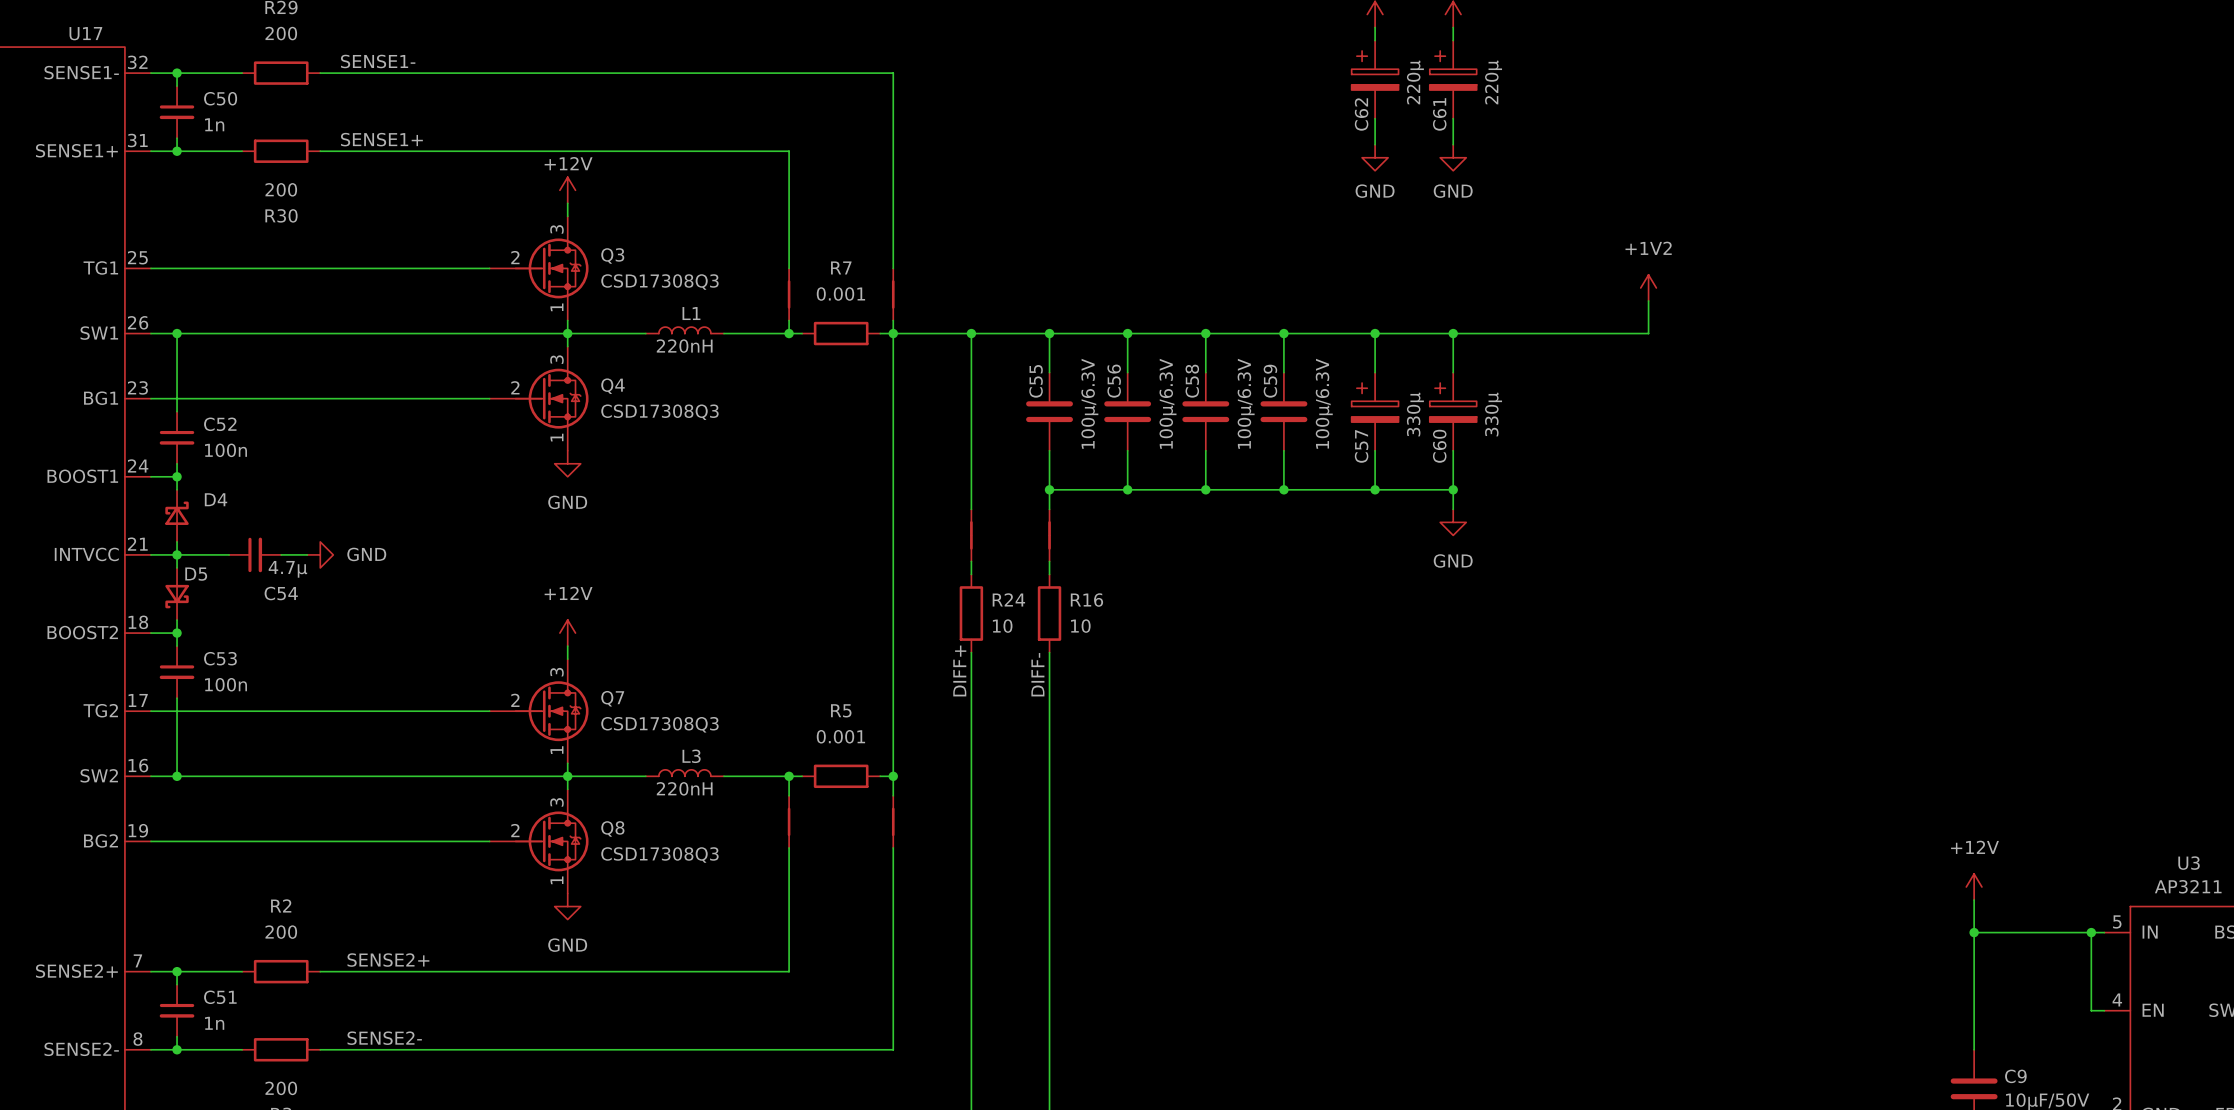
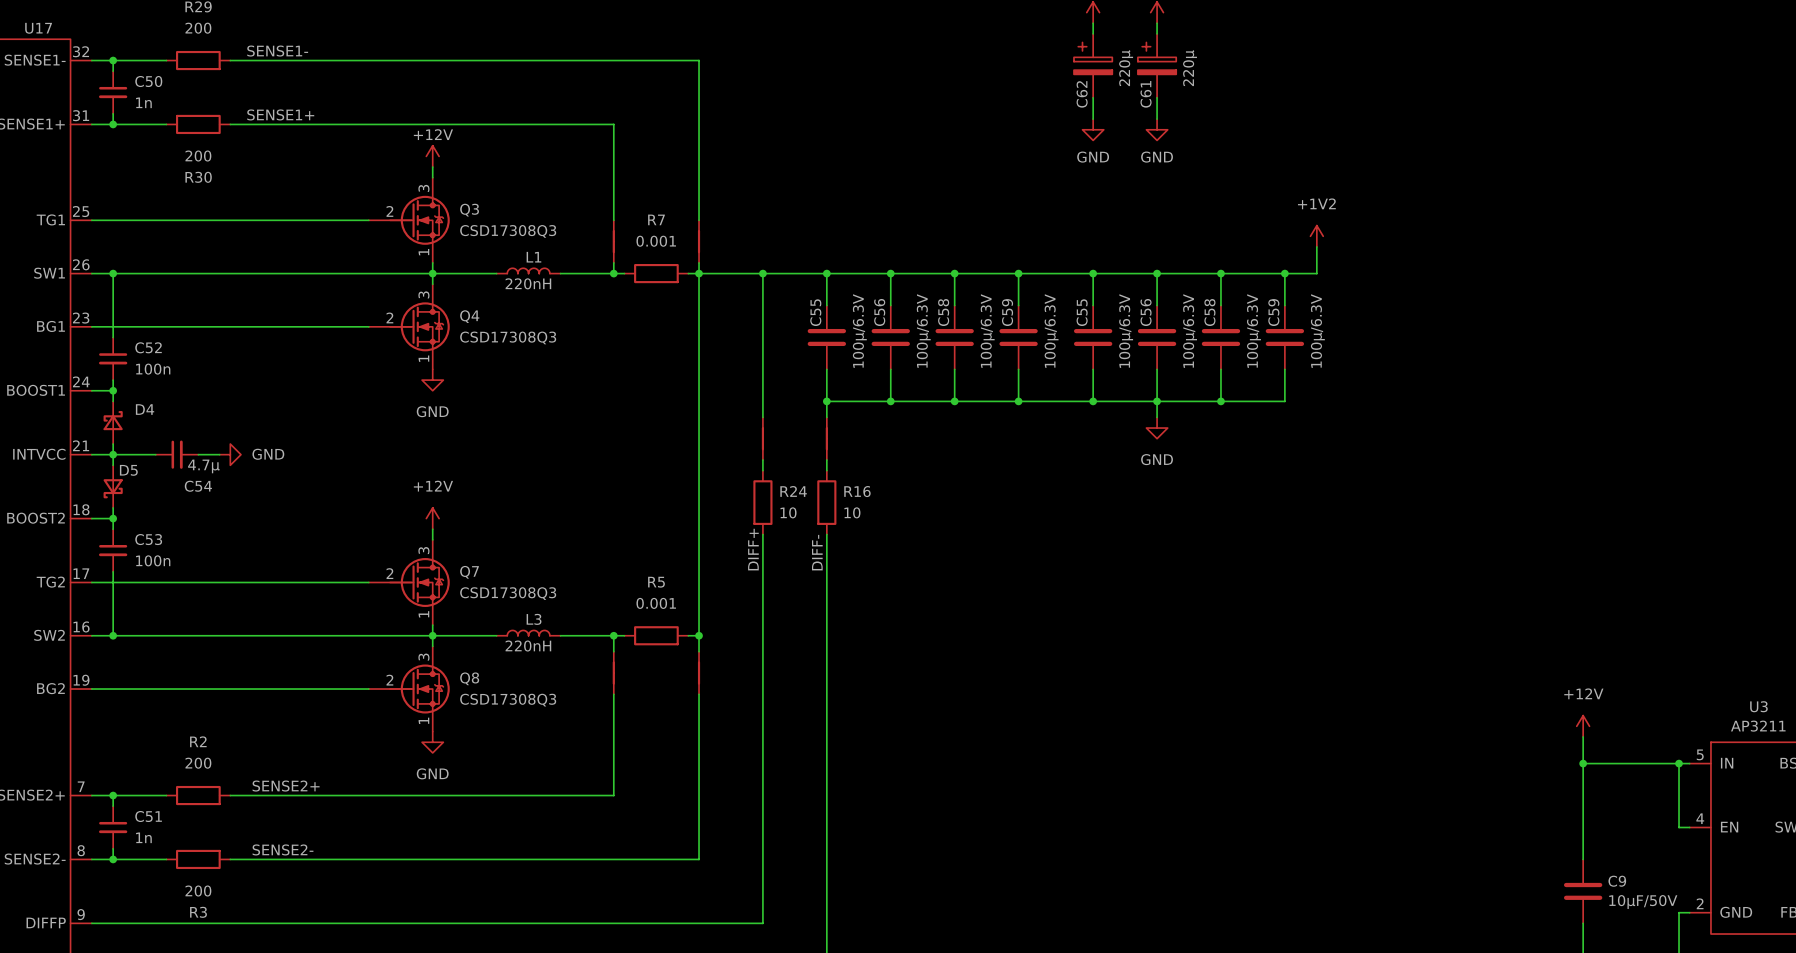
wire: none -> (1220, 273) (1220, 305)
junction: none -> (1220, 273)
wire: none -> (1284, 273) (1284, 305)
junction: none -> (1284, 273)
C57: 330µ (1375, 411) -> none
C55: none -> 100µ/6.3V (1093, 337)
C60: 330µ (1453, 411) -> none
C56: none -> 100µ/6.3V (1157, 337)
C58: none -> 100µ/6.3V (1220, 337)
C59: none -> 100µ/6.3V (1284, 337)
wire: none -> (1220, 369) (1220, 401)
wire: none -> (1284, 369) (1284, 401) (1157, 401)
junction: none -> (1220, 401)

